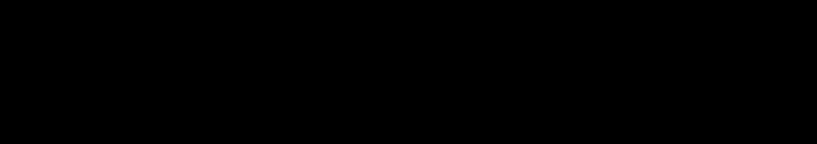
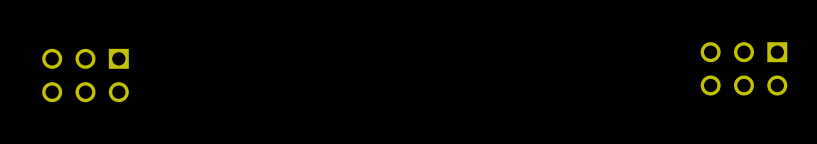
part: none -> (743, 68)
part: none -> (85, 75)

